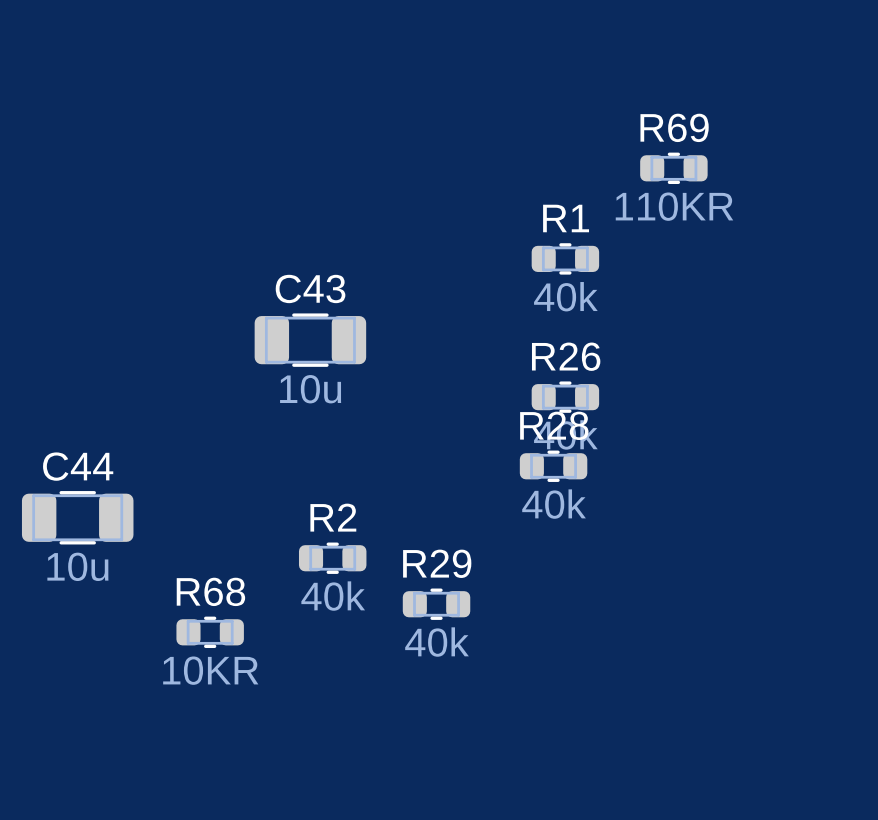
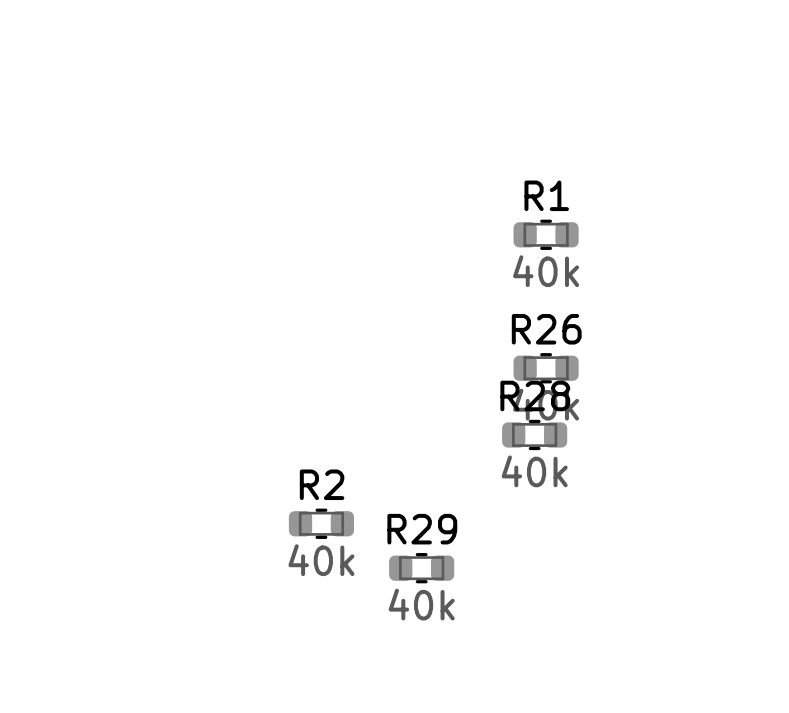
R69: 110KR (673, 168) -> none
C43: 10u (310, 340) -> none
C44: 10u (77, 517) -> none
R68: 10KR (210, 632) -> none

